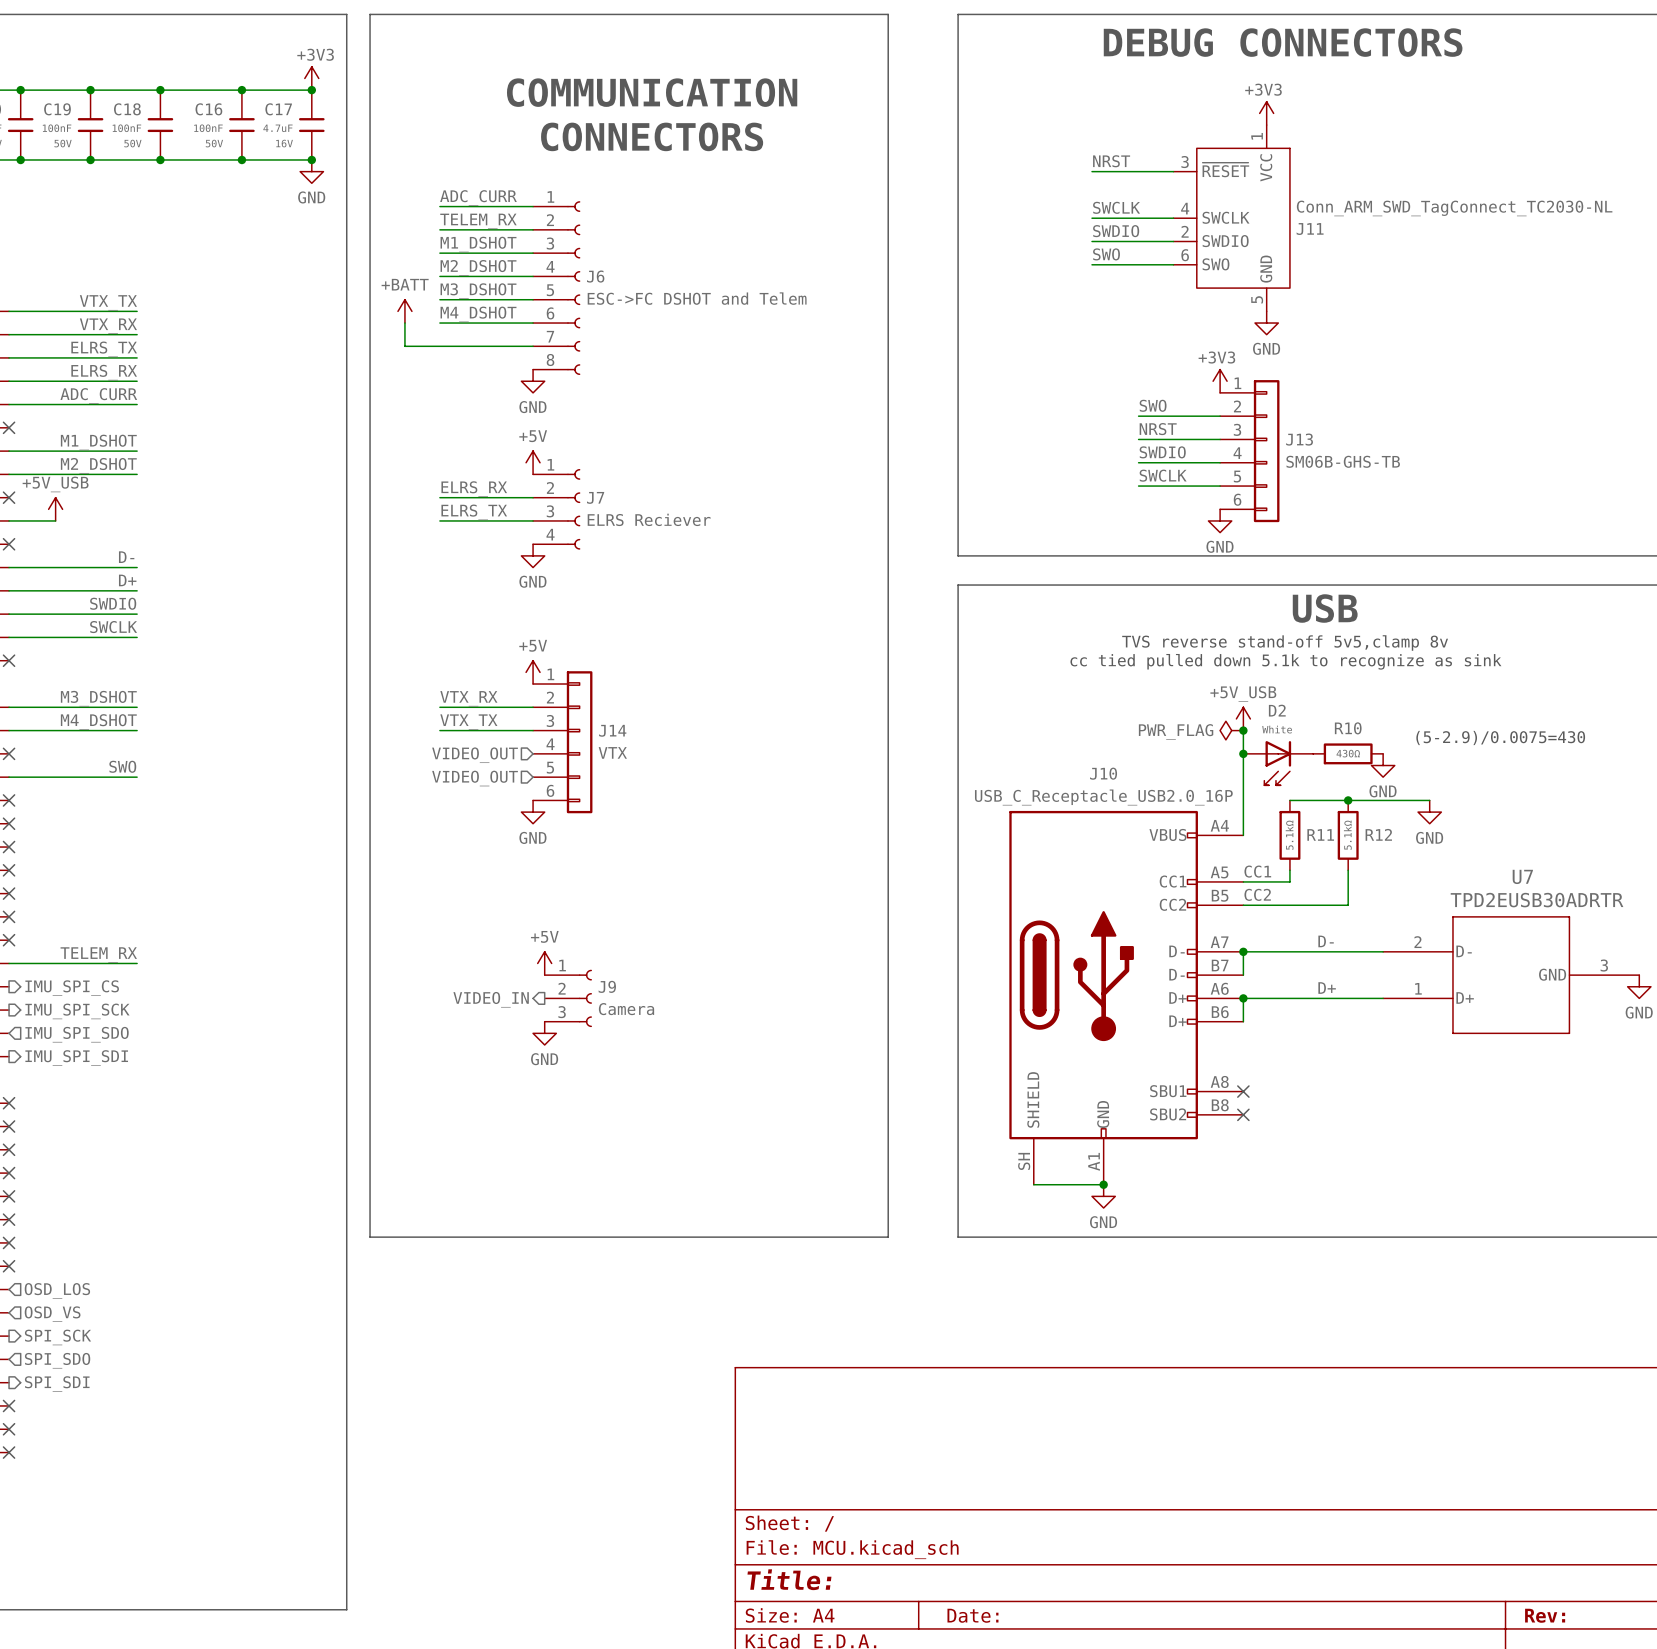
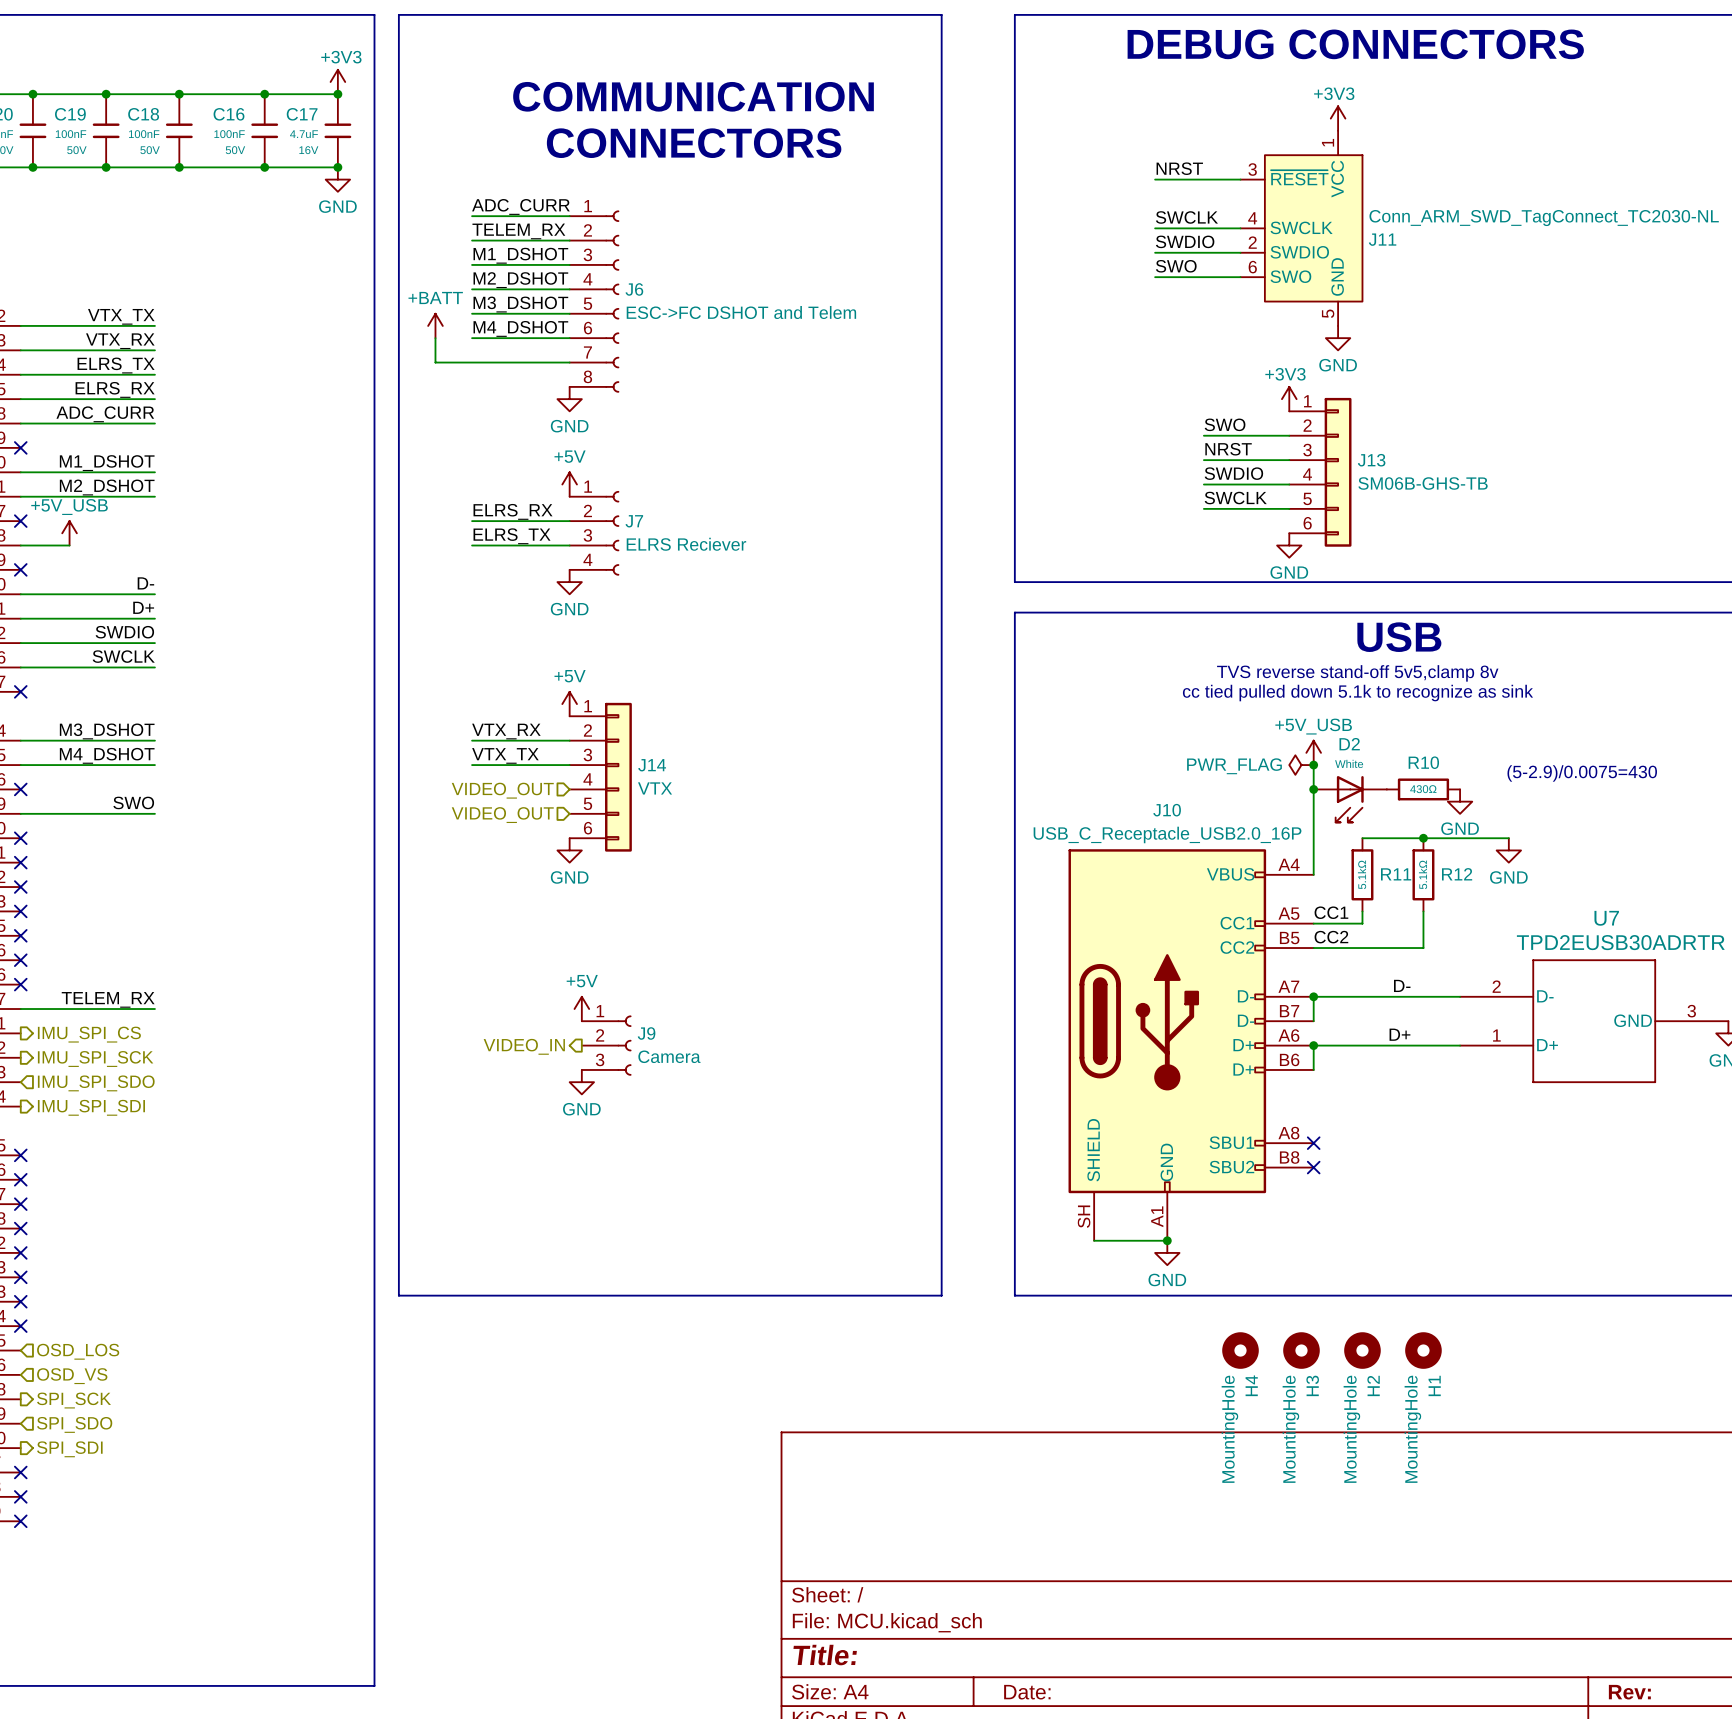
H4: none -> MountingHole (1240, 1350)
H3: none -> MountingHole (1301, 1350)
H2: none -> MountingHole (1362, 1350)
H1: none -> MountingHole (1423, 1350)

